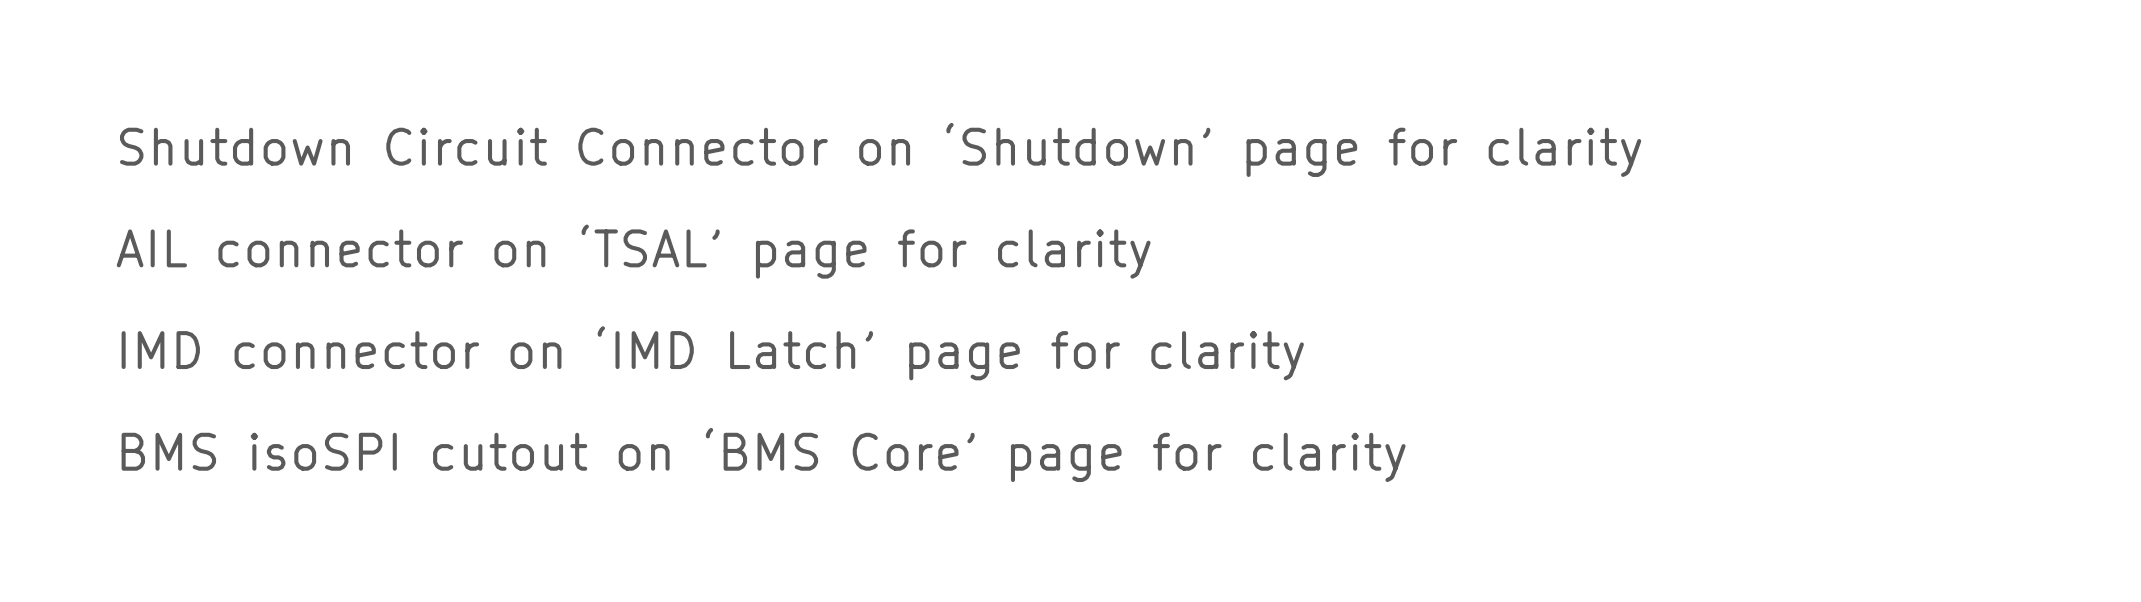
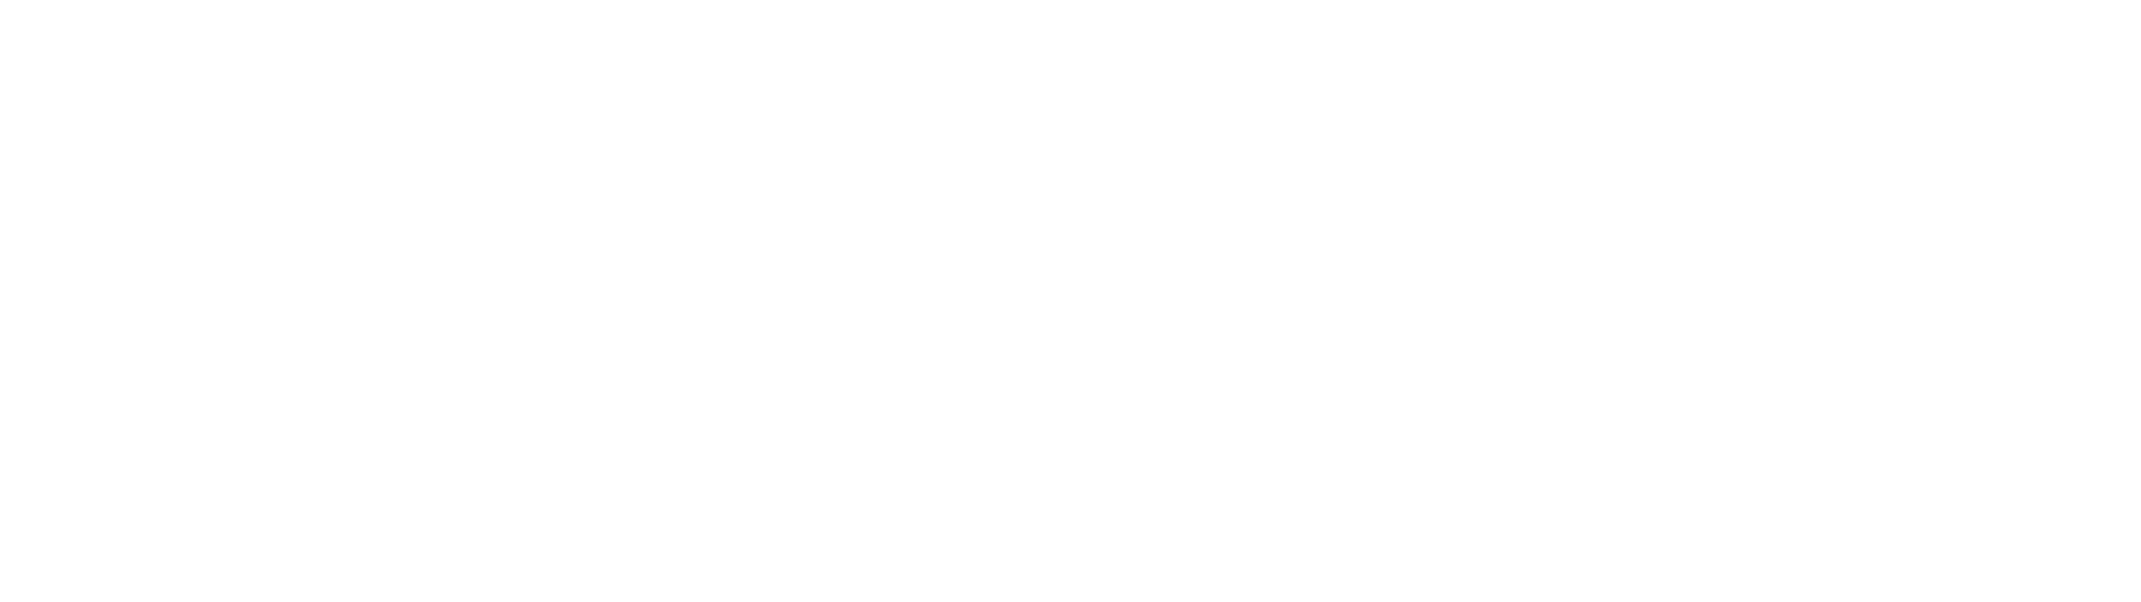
text: Shutdown Circuit Connector on ‘Shutdown’ page for clarity (880, 149) -> none
text: AIL connector on ‘TSAL’ page for clarity (633, 251) -> none
text: IMD connector on ‘IMD Latch’ page for clarity (712, 353) -> none
text: BMS isoSPI cutout on ‘BMS Core’ page for clarity (763, 454) -> none

